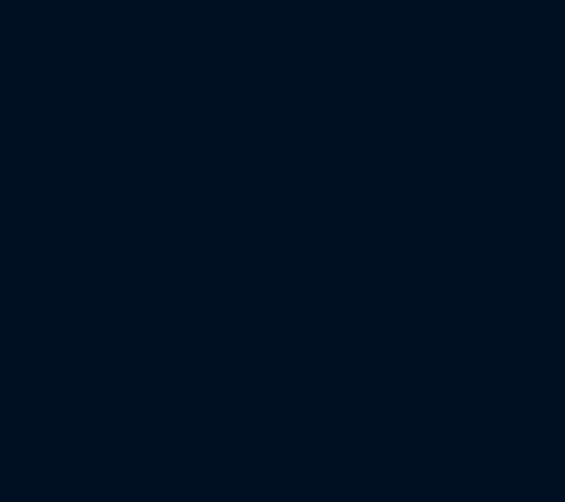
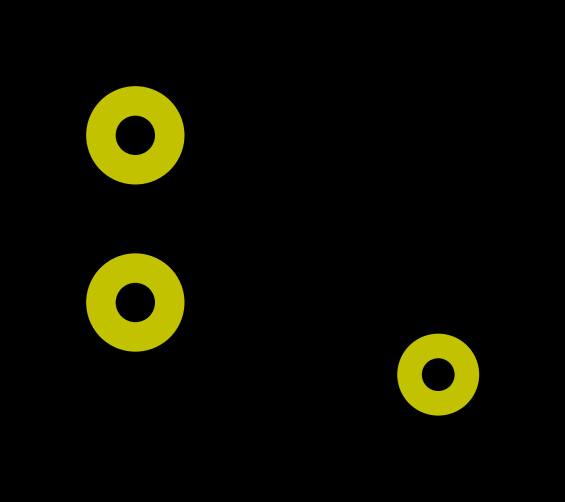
part: none -> (135, 135)
part: none -> (135, 302)
part: none -> (438, 374)

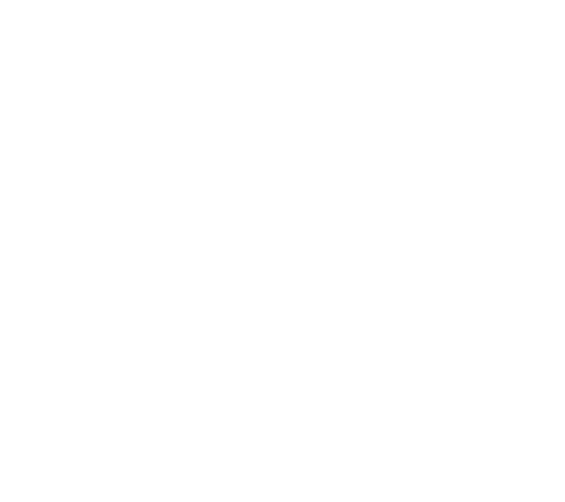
part: (135, 135) -> none
part: (135, 302) -> none
part: (438, 374) -> none

